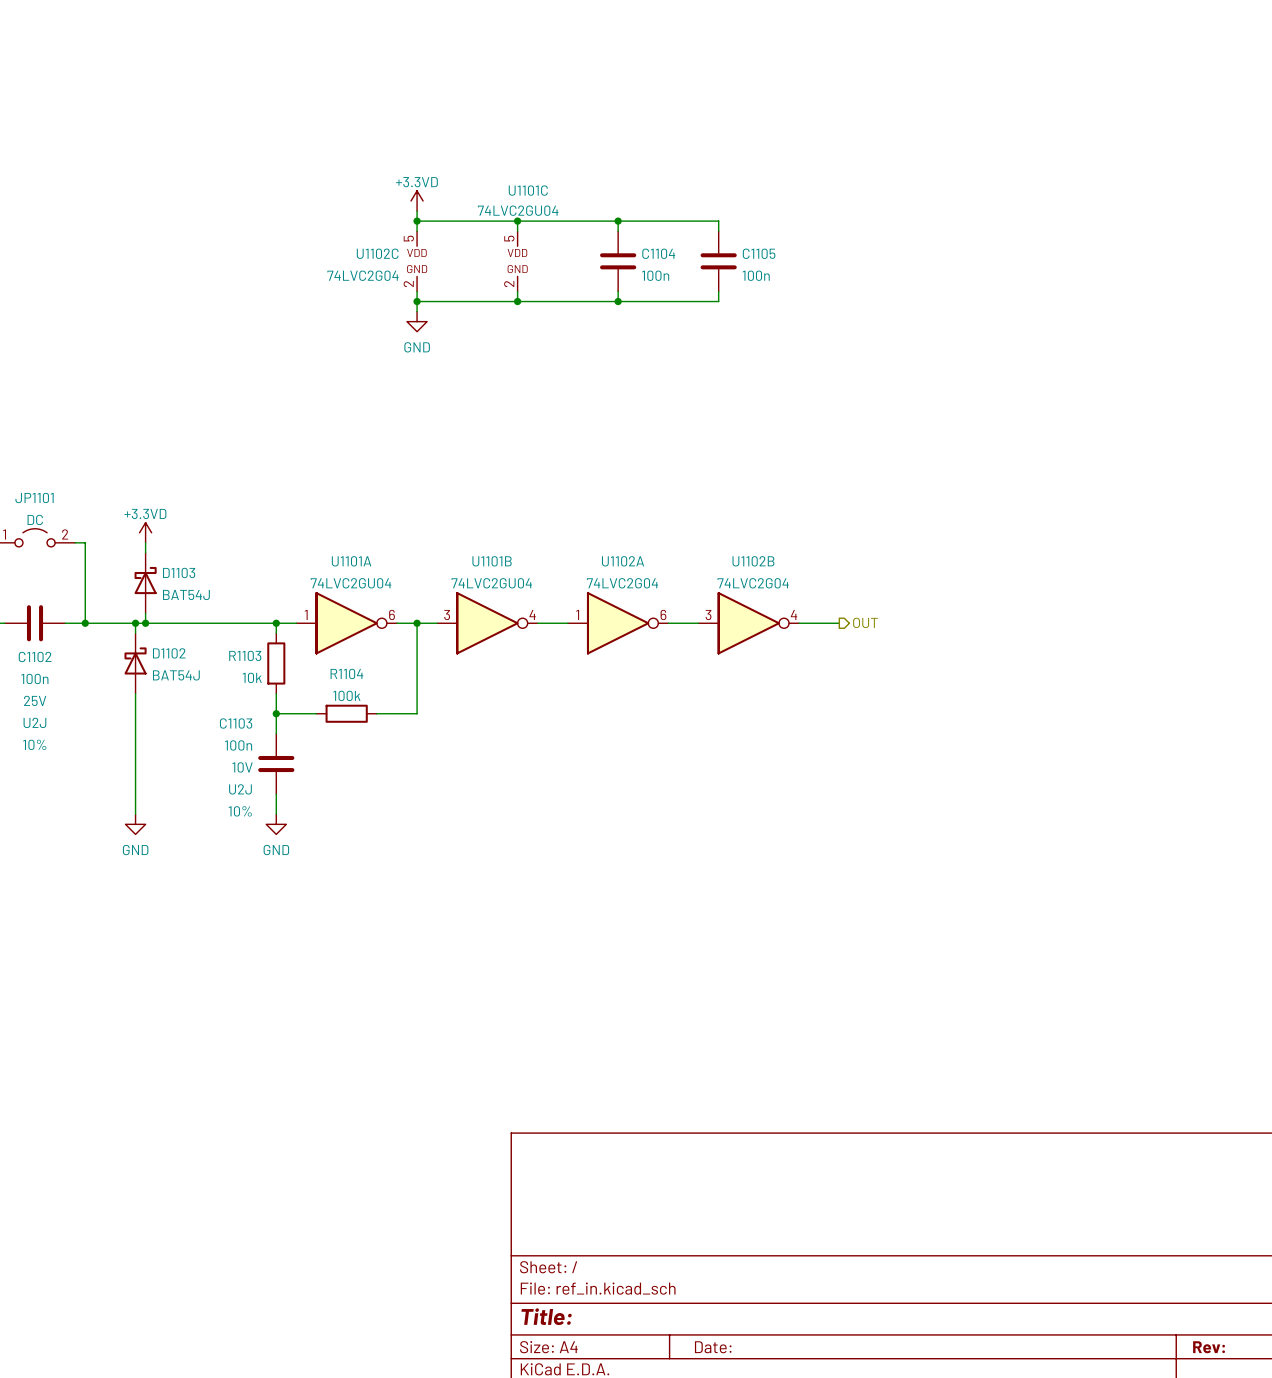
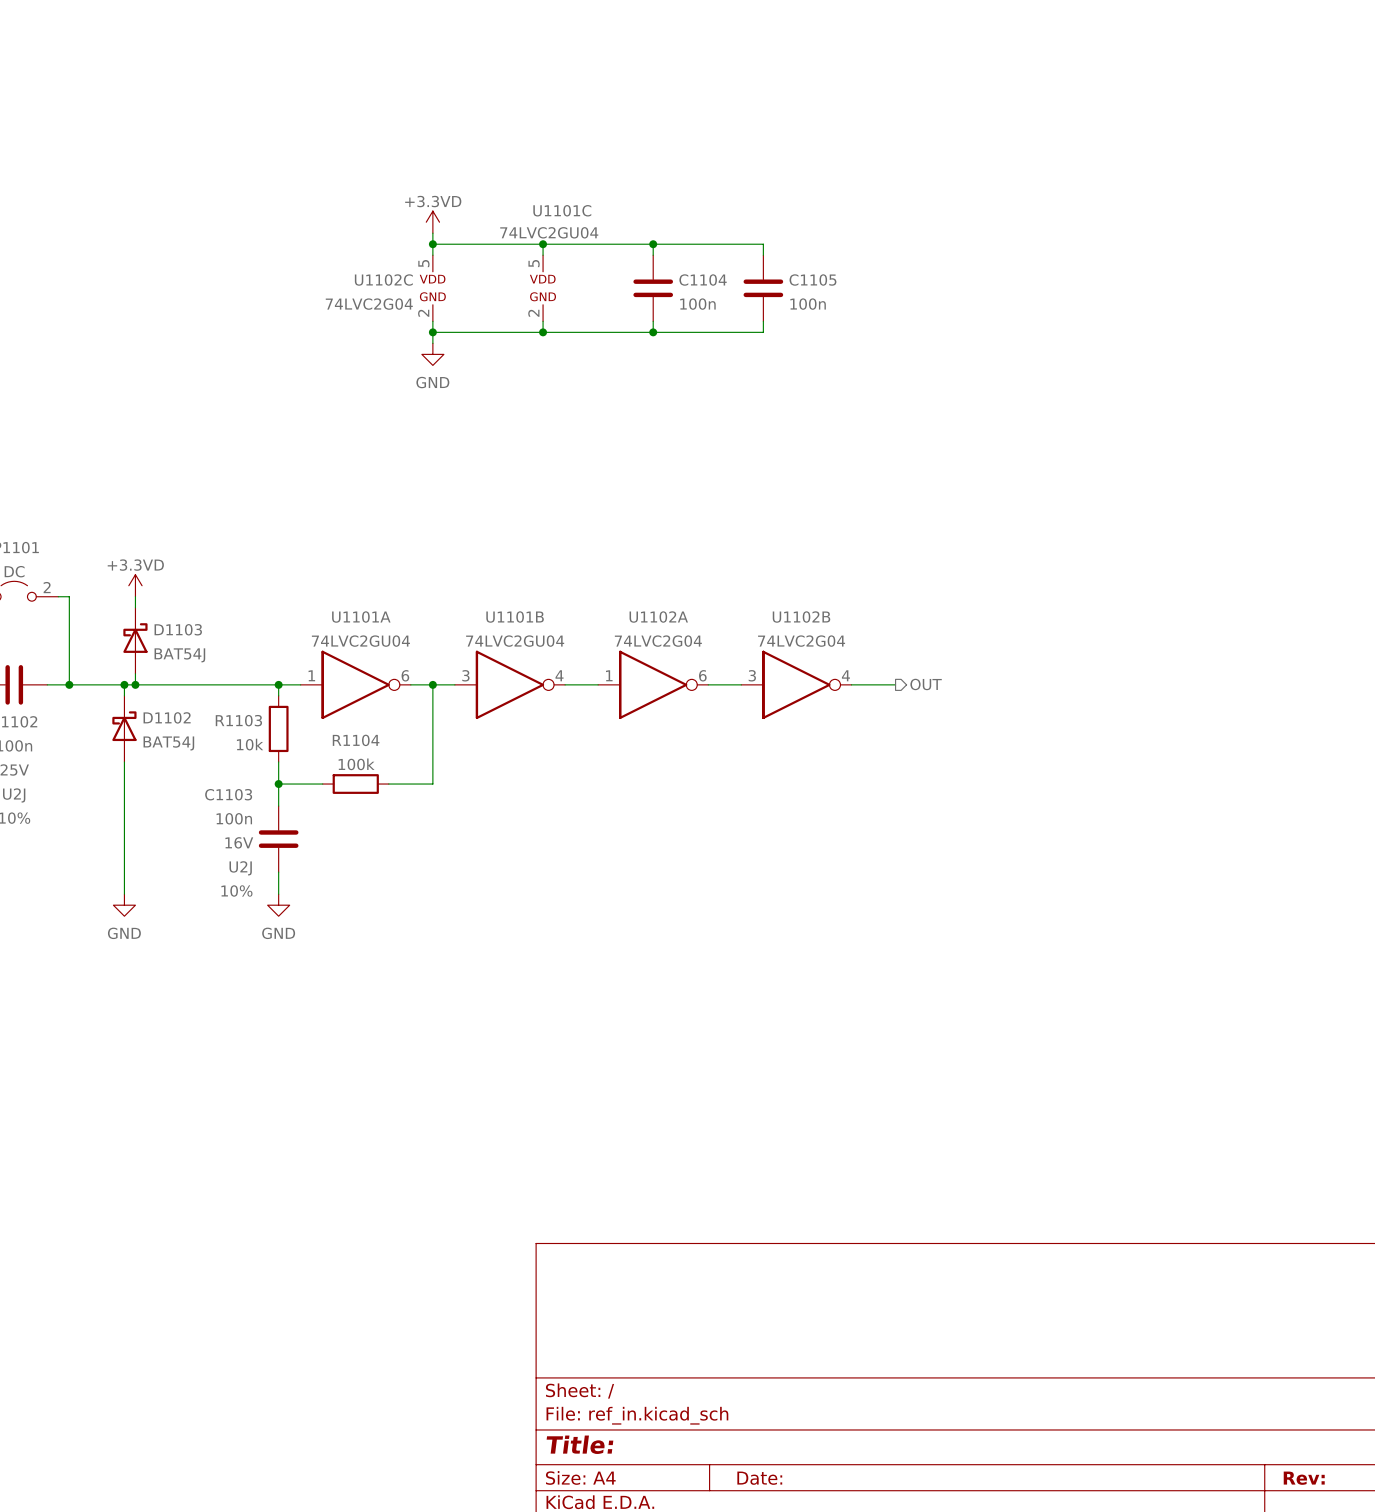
C1103 text: 10V (242, 767) -> 16V (239, 842)

